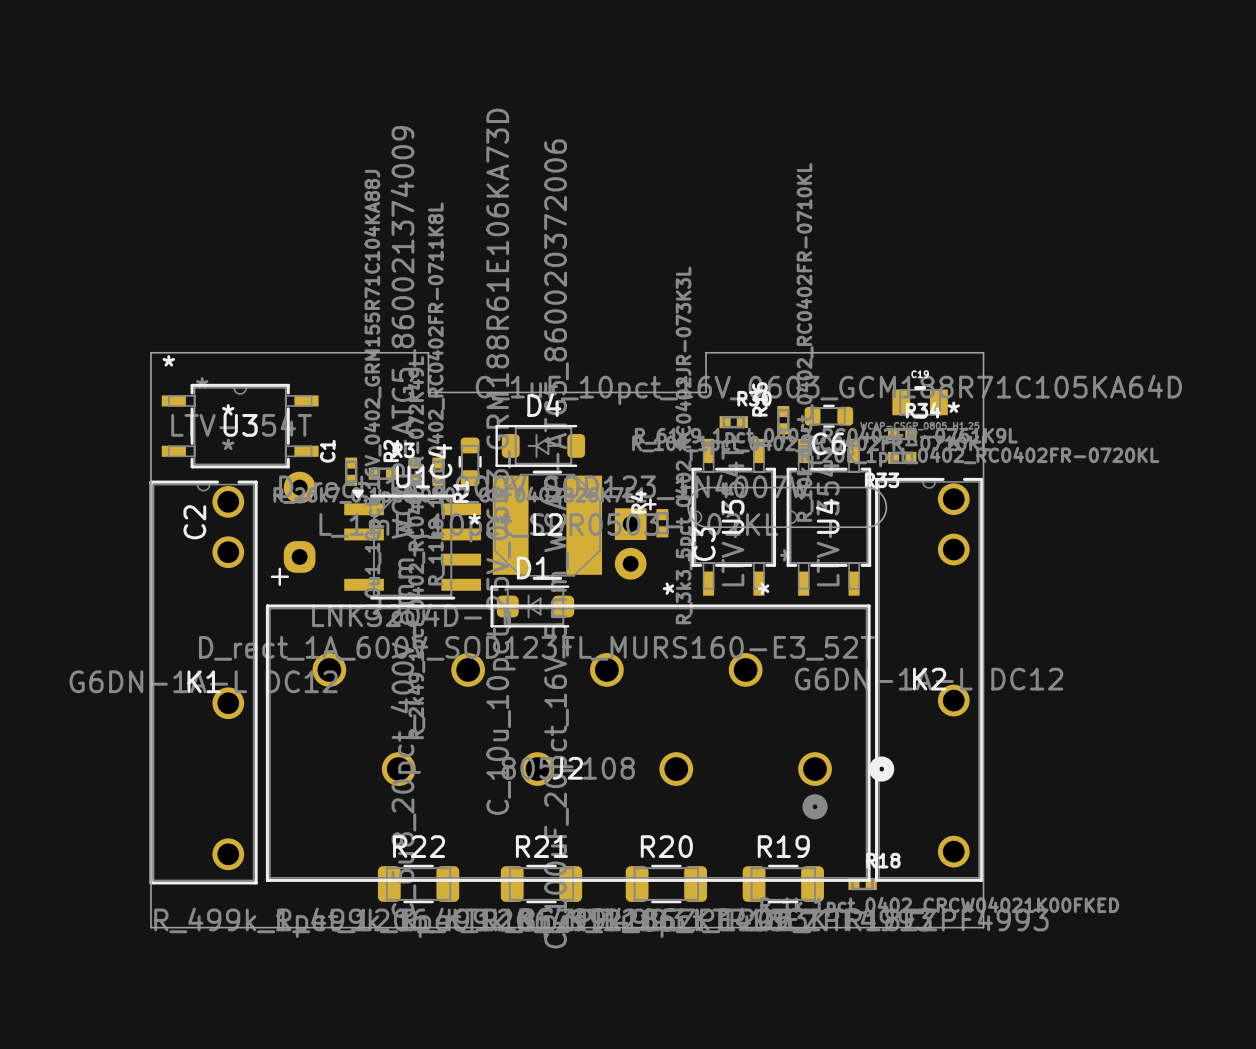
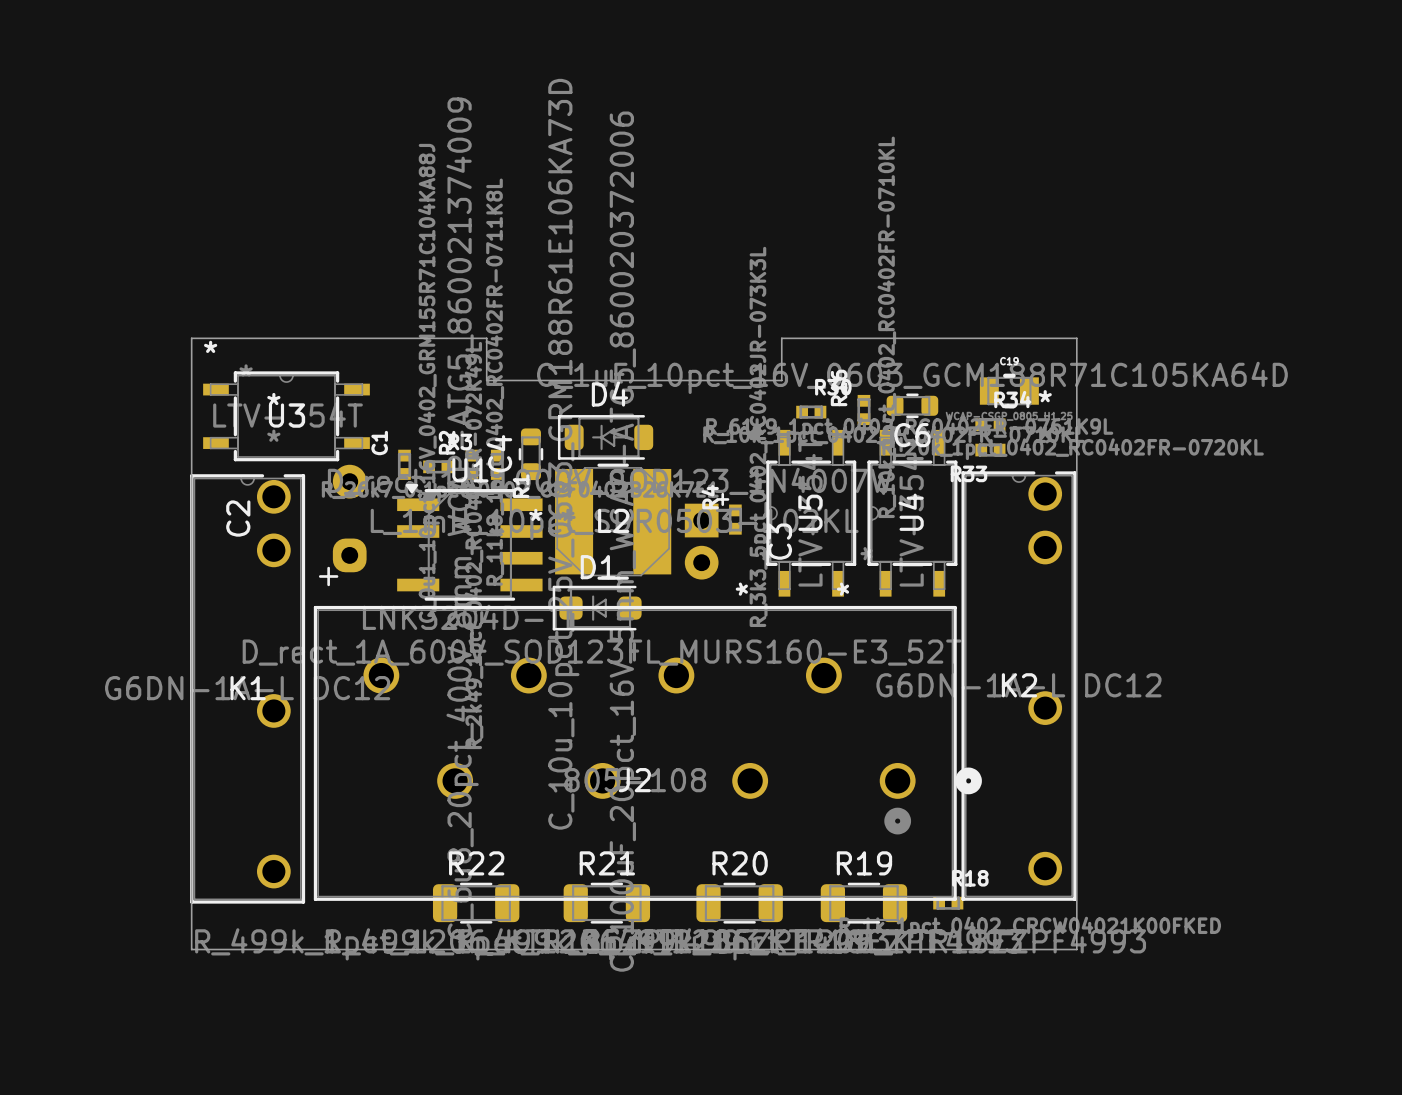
board edge: (707, 487) (868, 487) (881, 494) (885, 500) (886, 509) (881, 520) (868, 527) (705, 527) (693, 521) (689, 514) (688, 507) (689, 499) (693, 493) (700, 489) (707, 487) -> none

